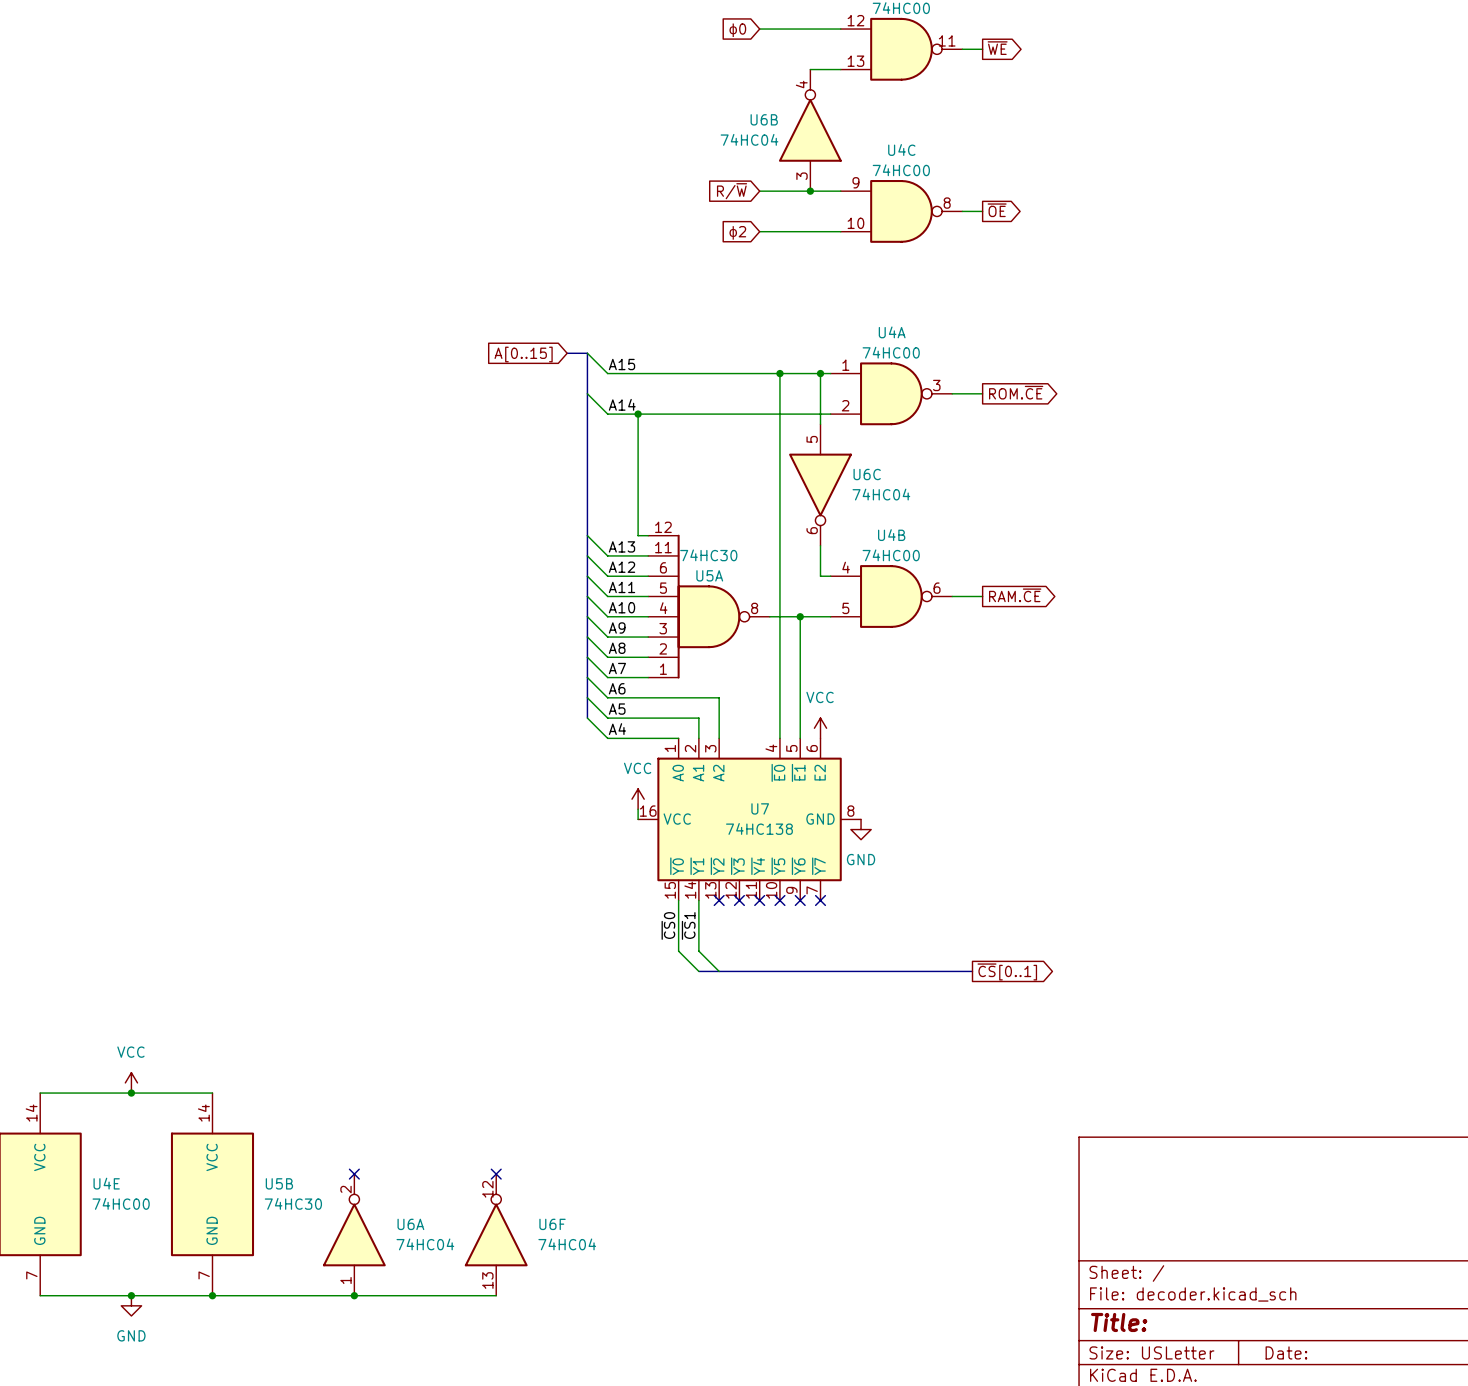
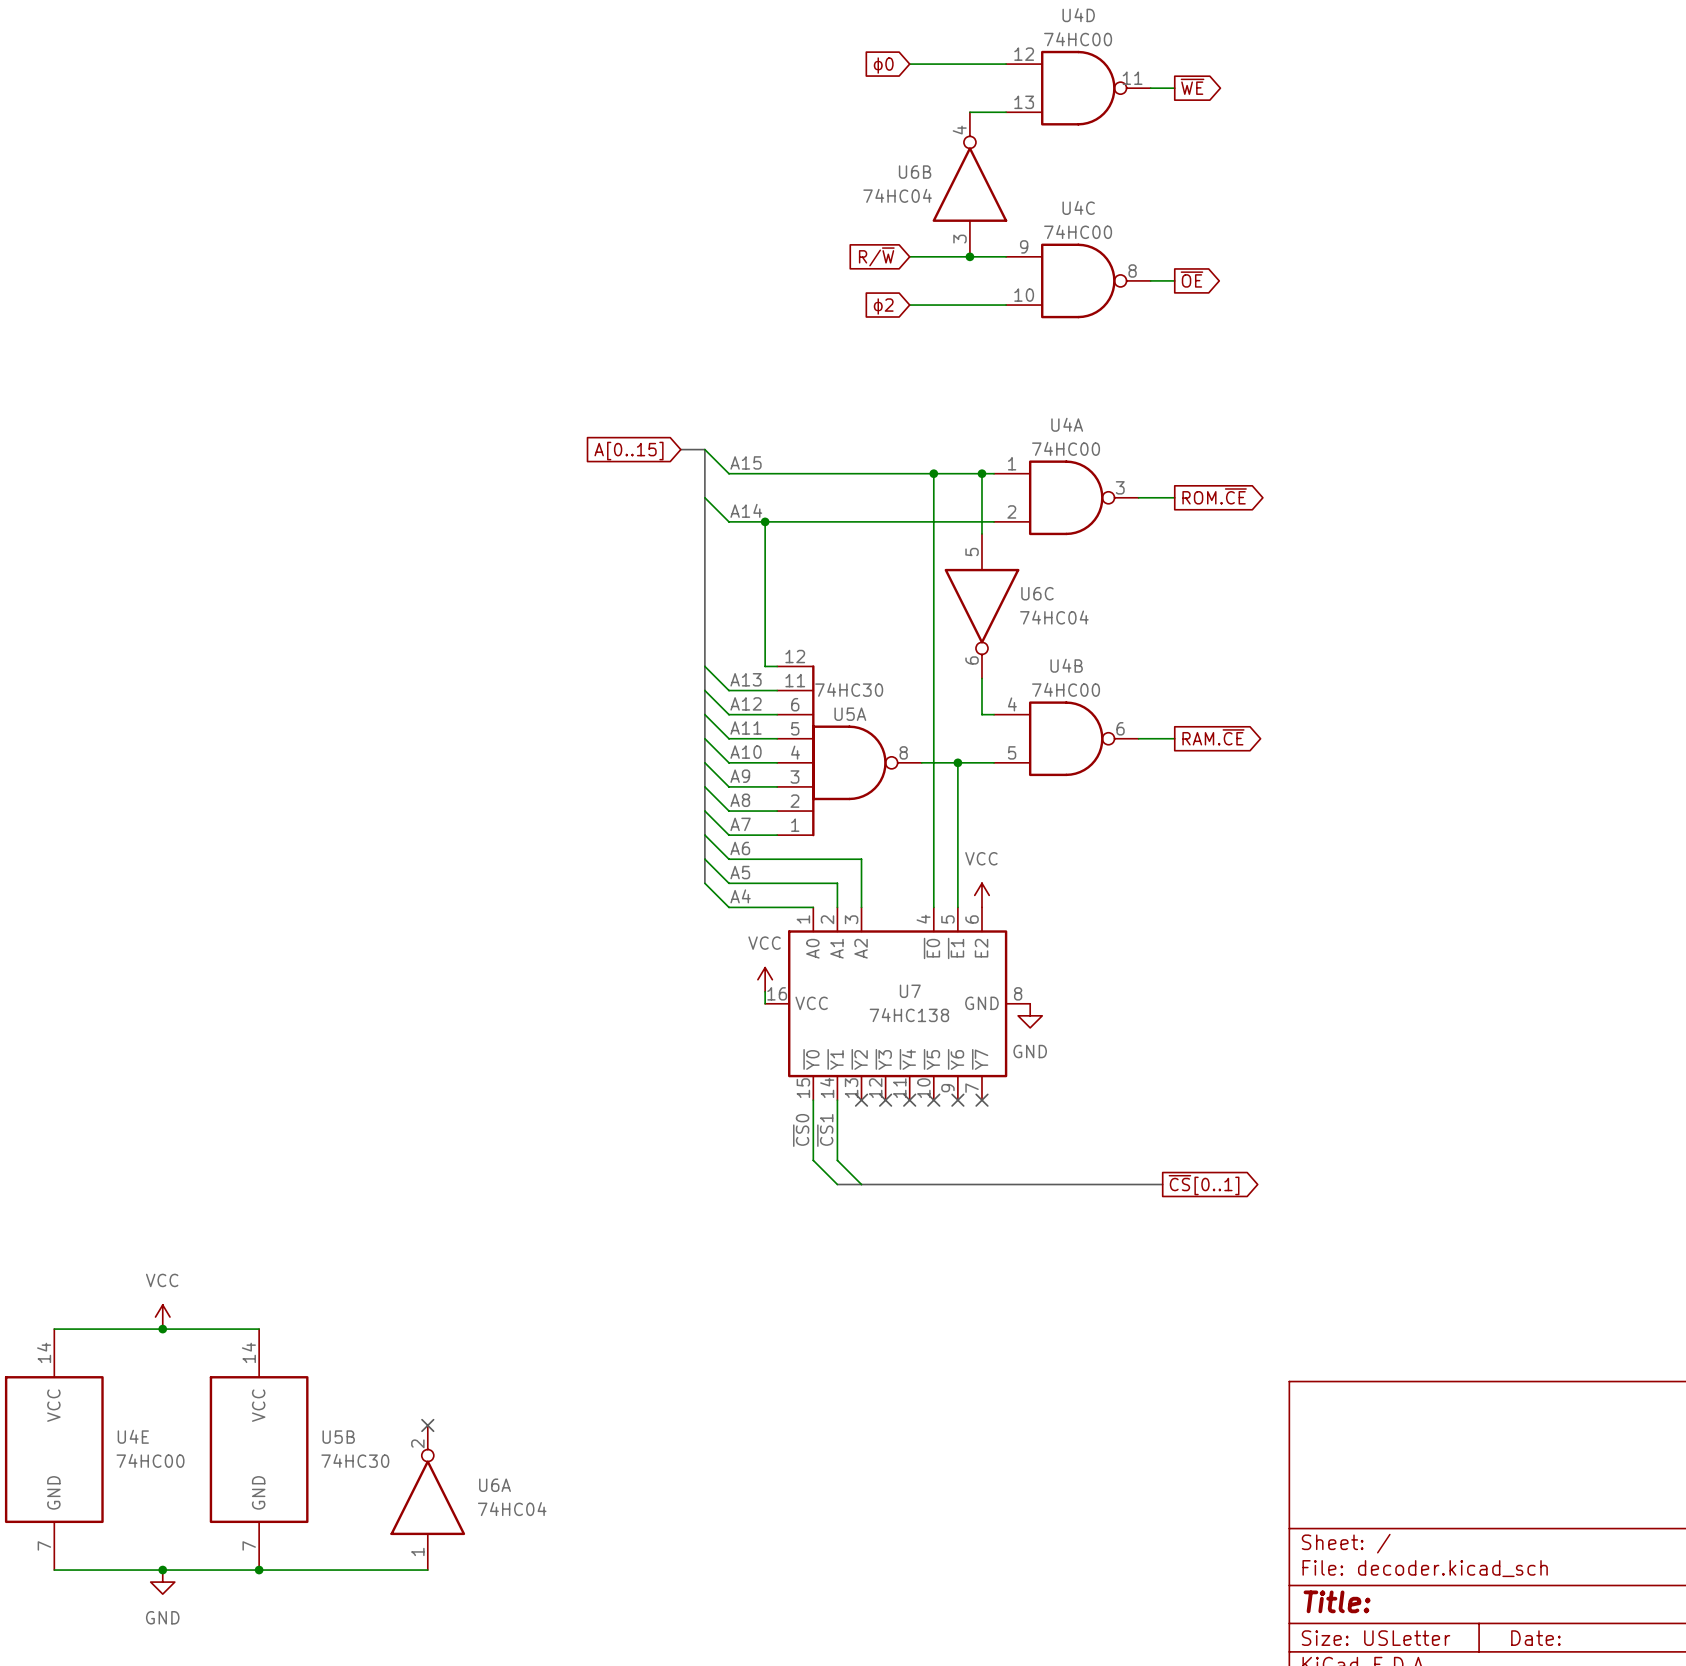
no-connect mark: (496, 1174) -> none
U6F: 74HC04 (496, 1234) -> none
wire: (354, 1295) (496, 1295) -> none
junction: (354, 1295) -> none

